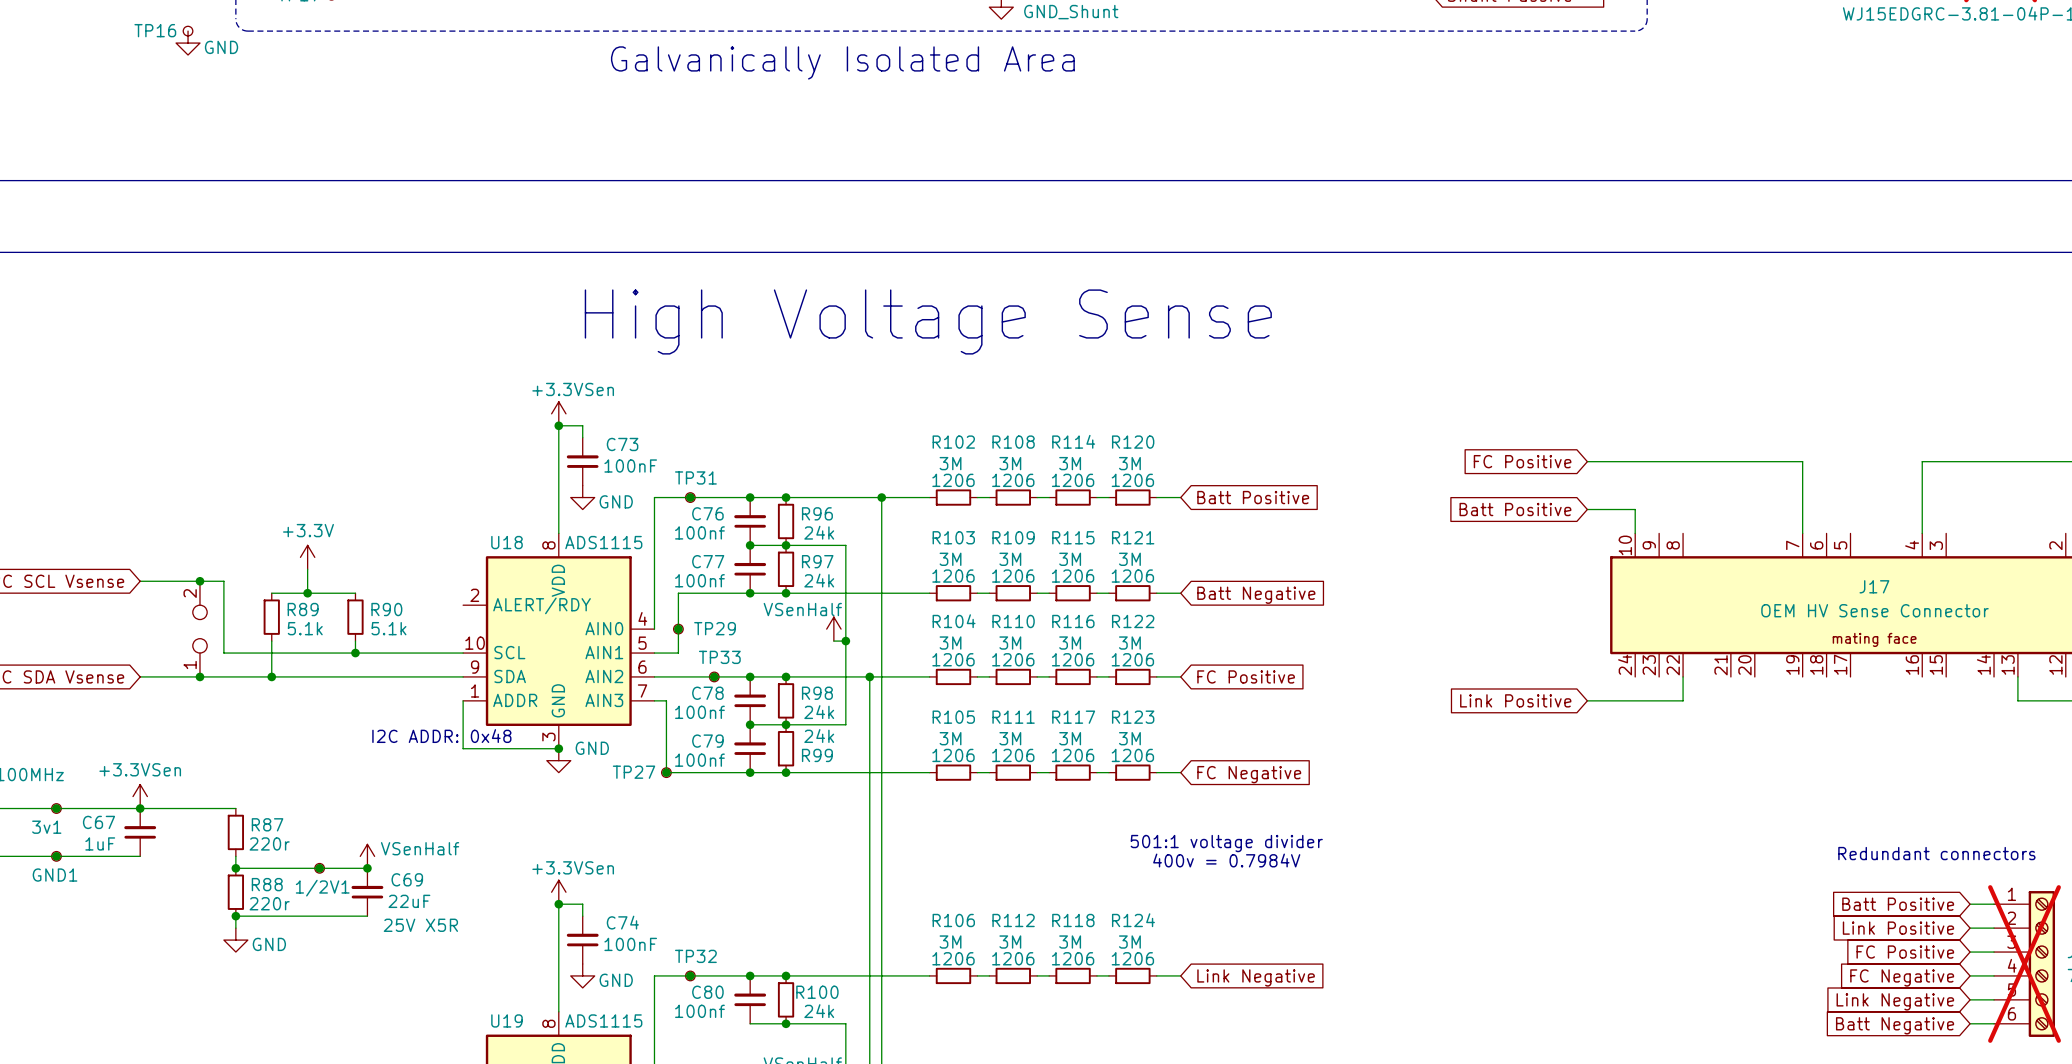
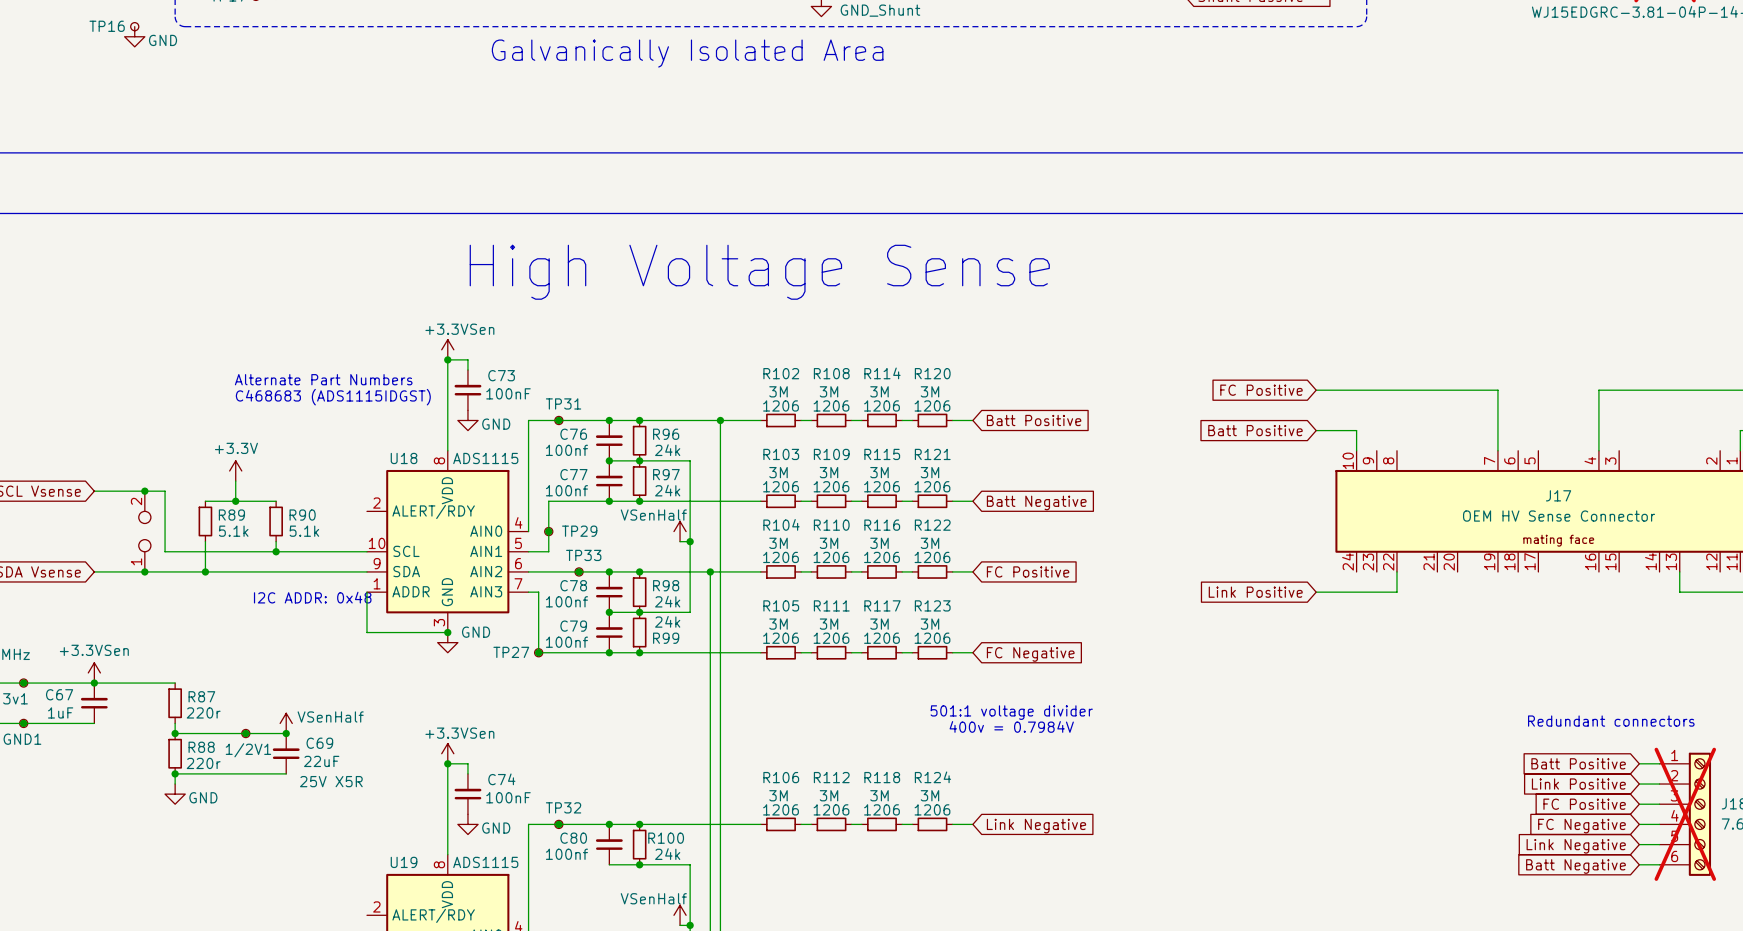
text: none -> Alternate Part Numbers (323, 379)
text: none -> C468683 (ADS1115IDGST) (333, 397)
text position: I2C ADDR: 0x48 (441, 736) -> I2C ADDR: 0x48 (312, 597)

